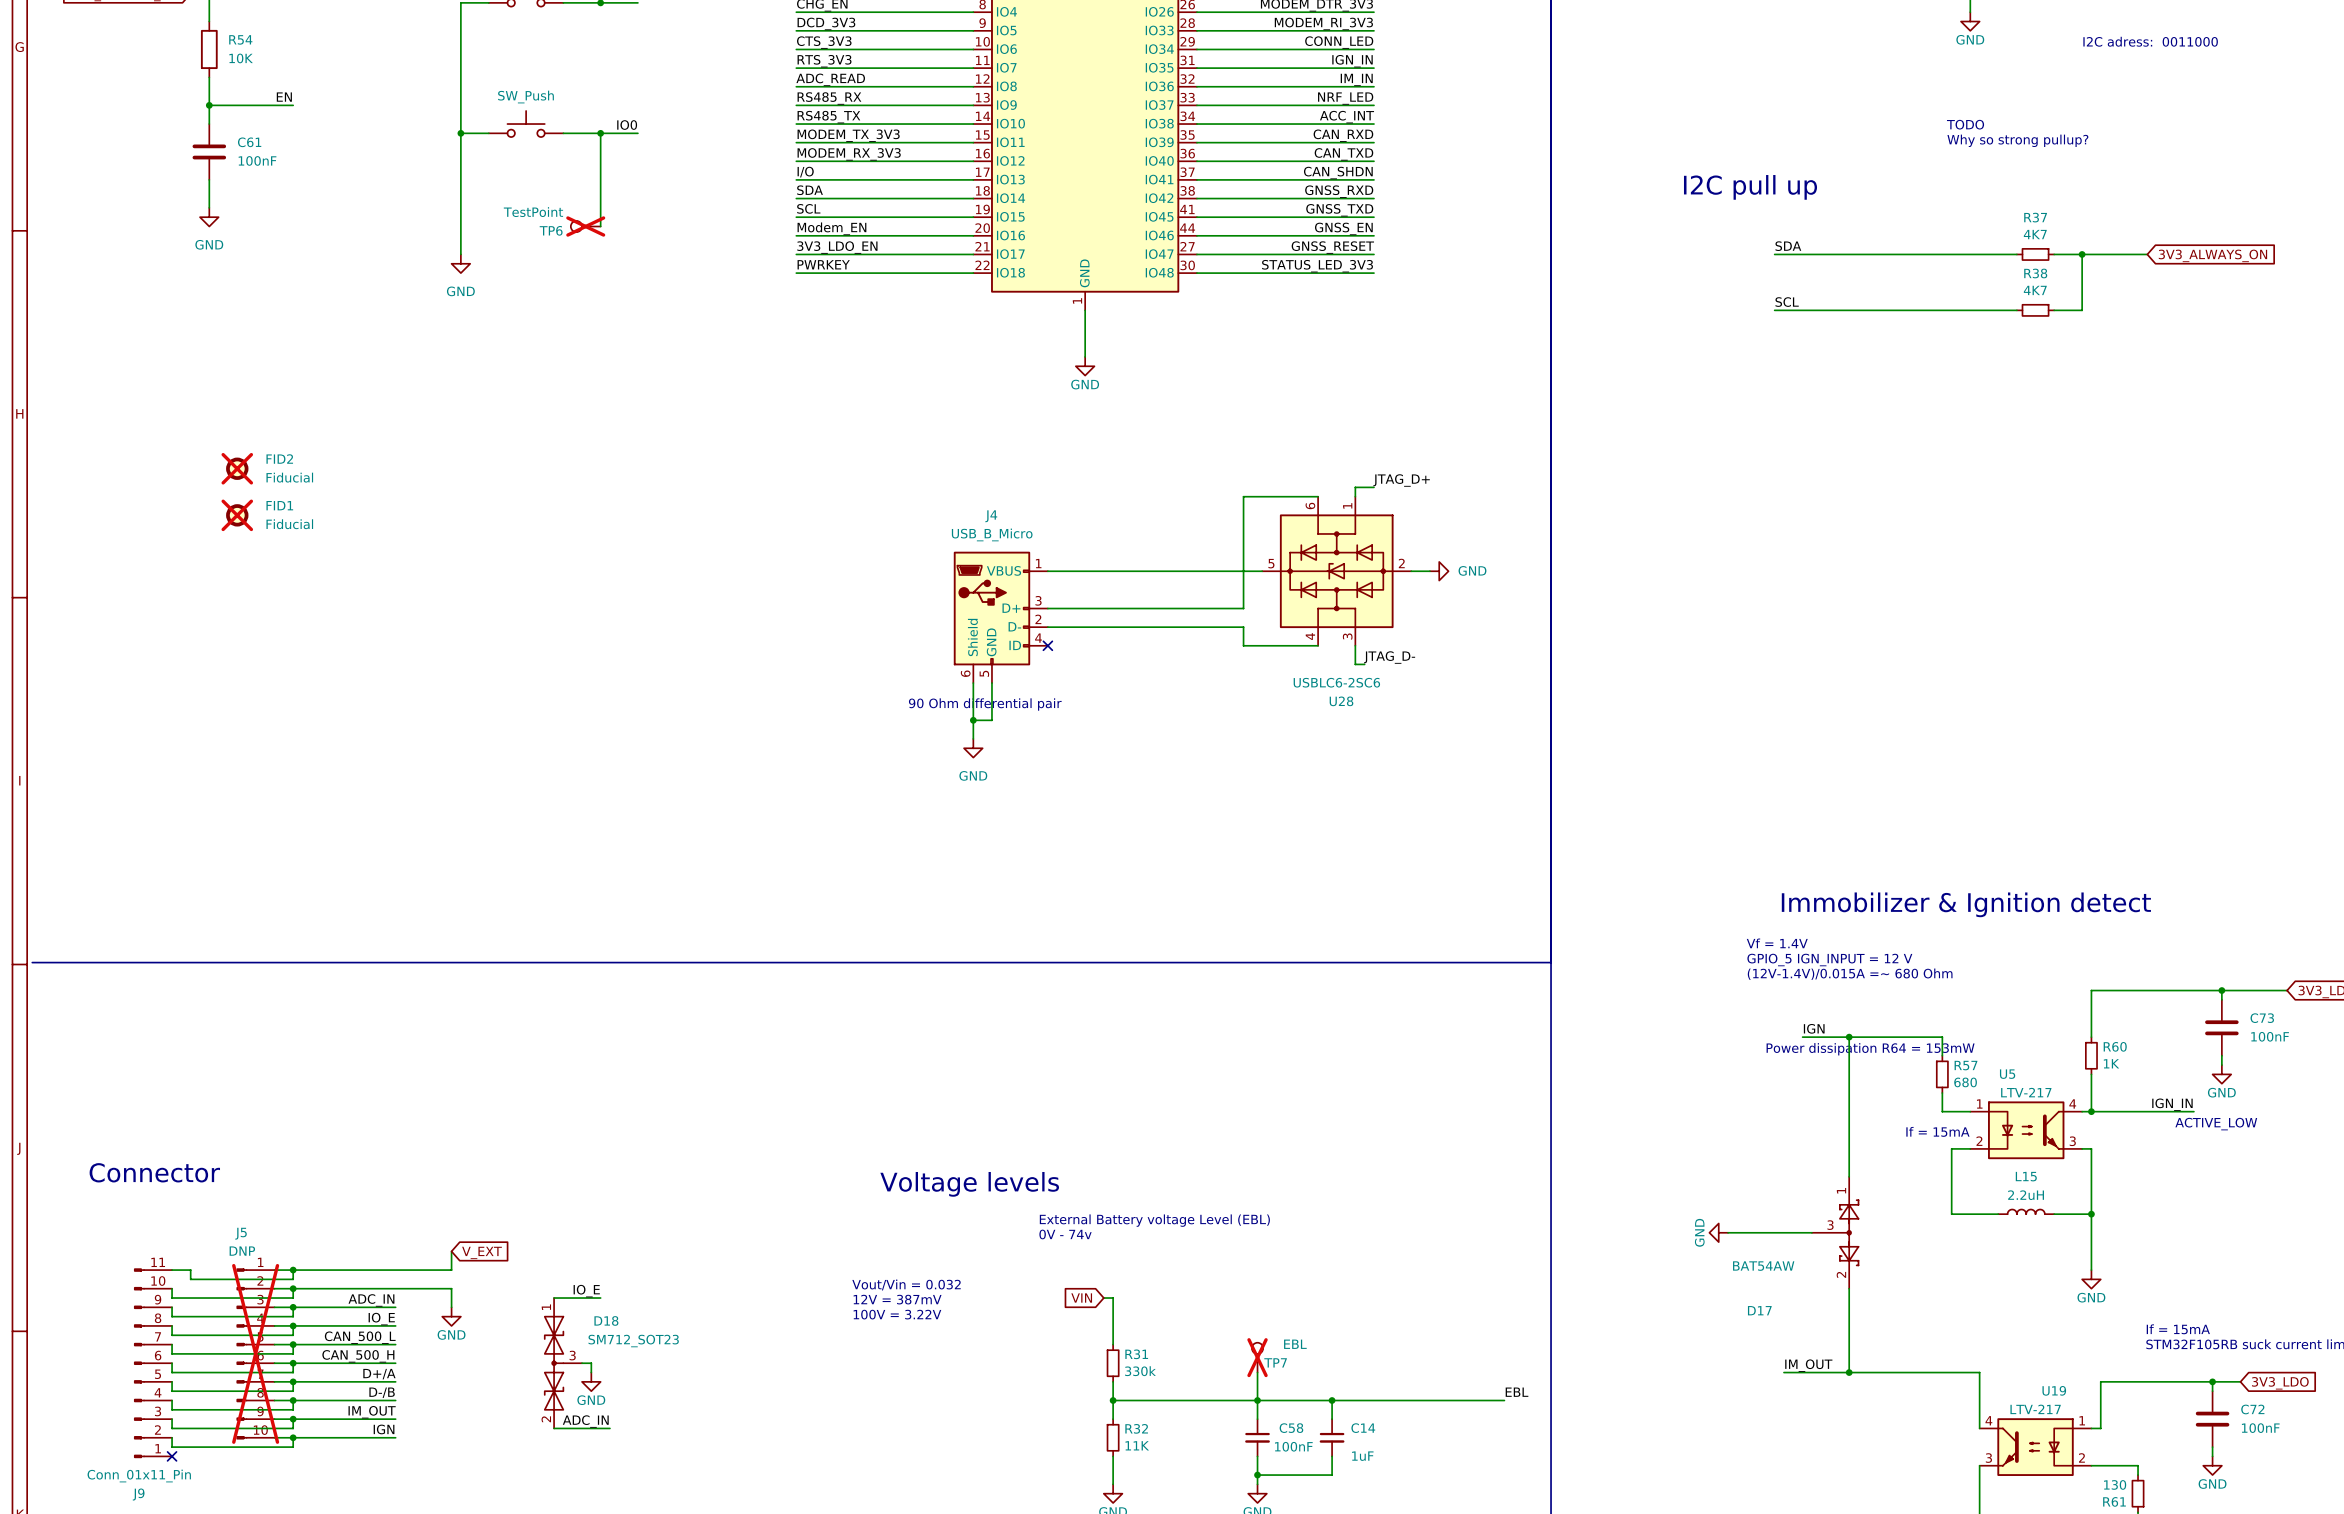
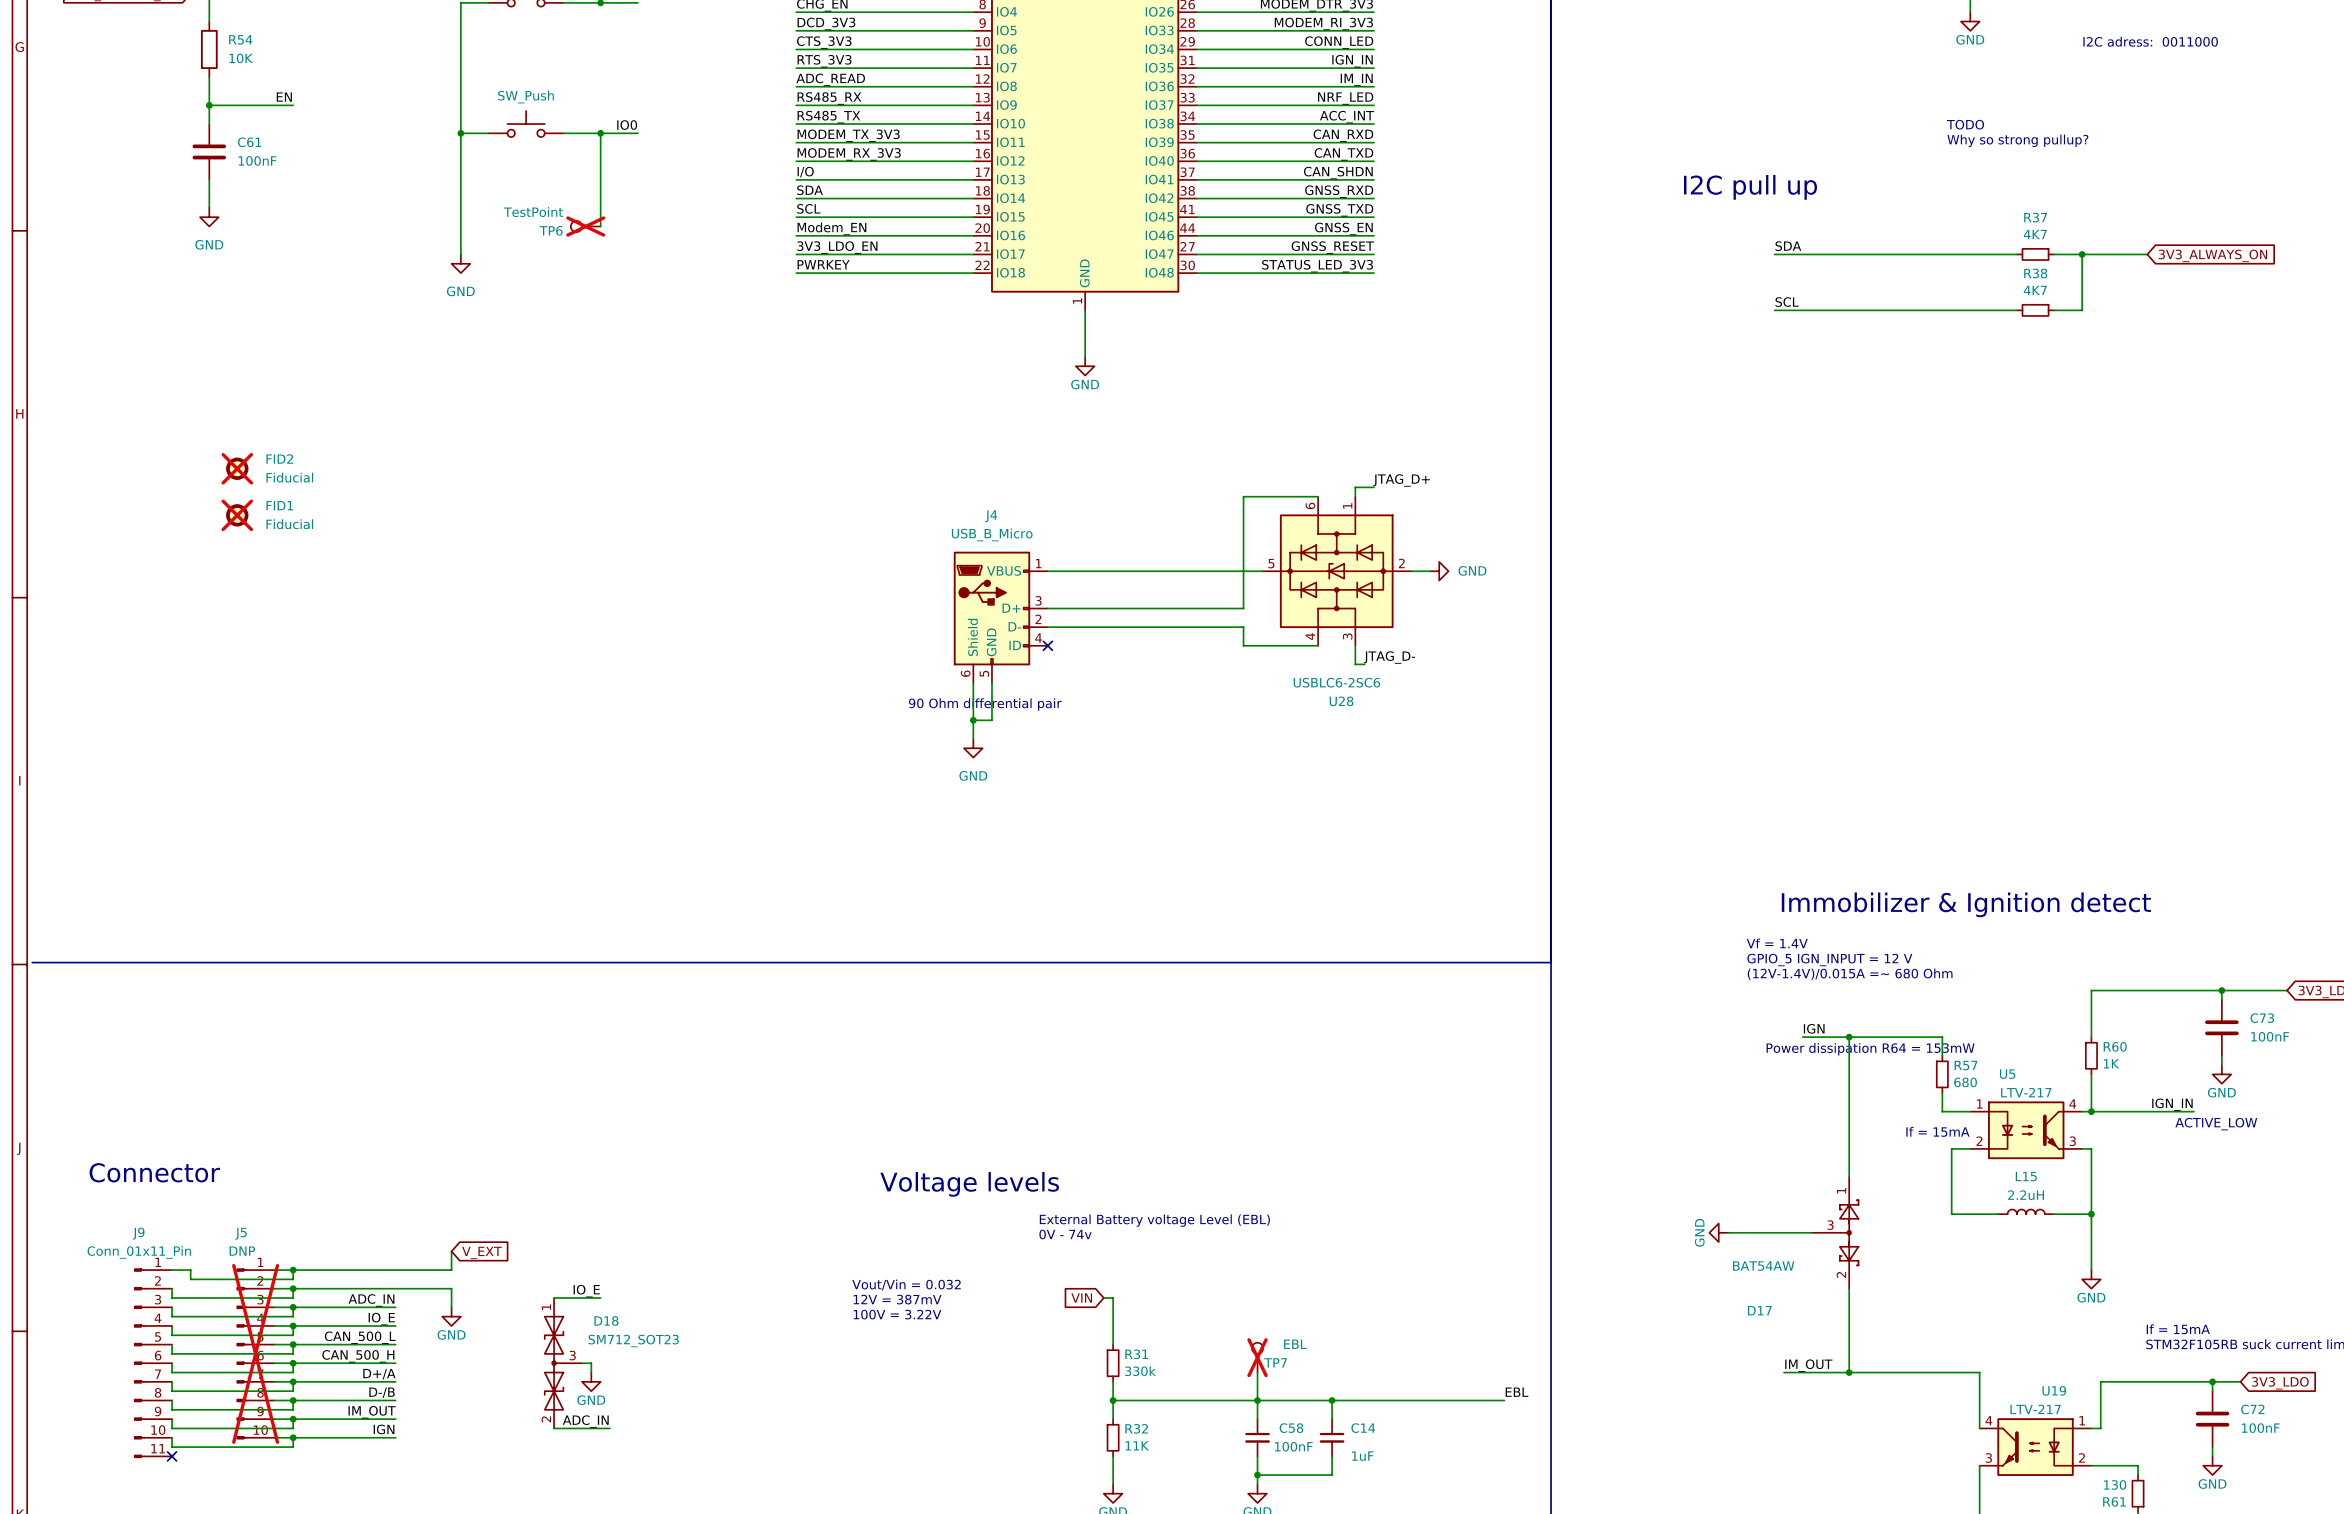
J9 flip: as is (139, 1363) -> up-down (139, 1363)

